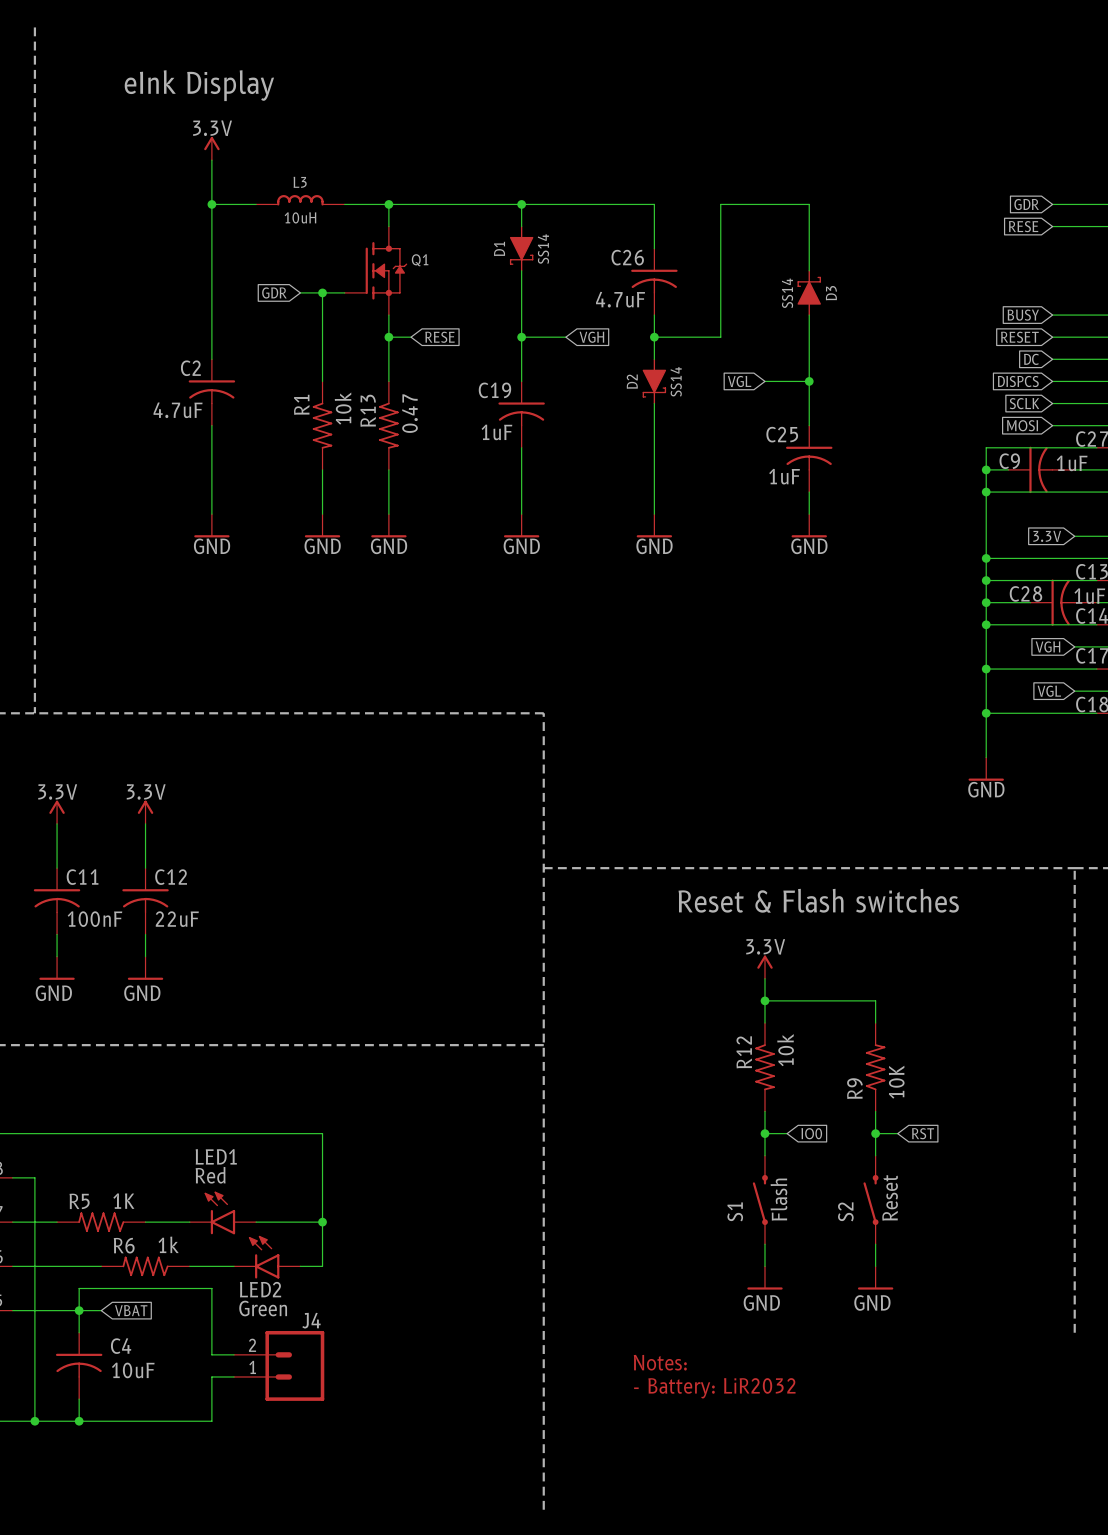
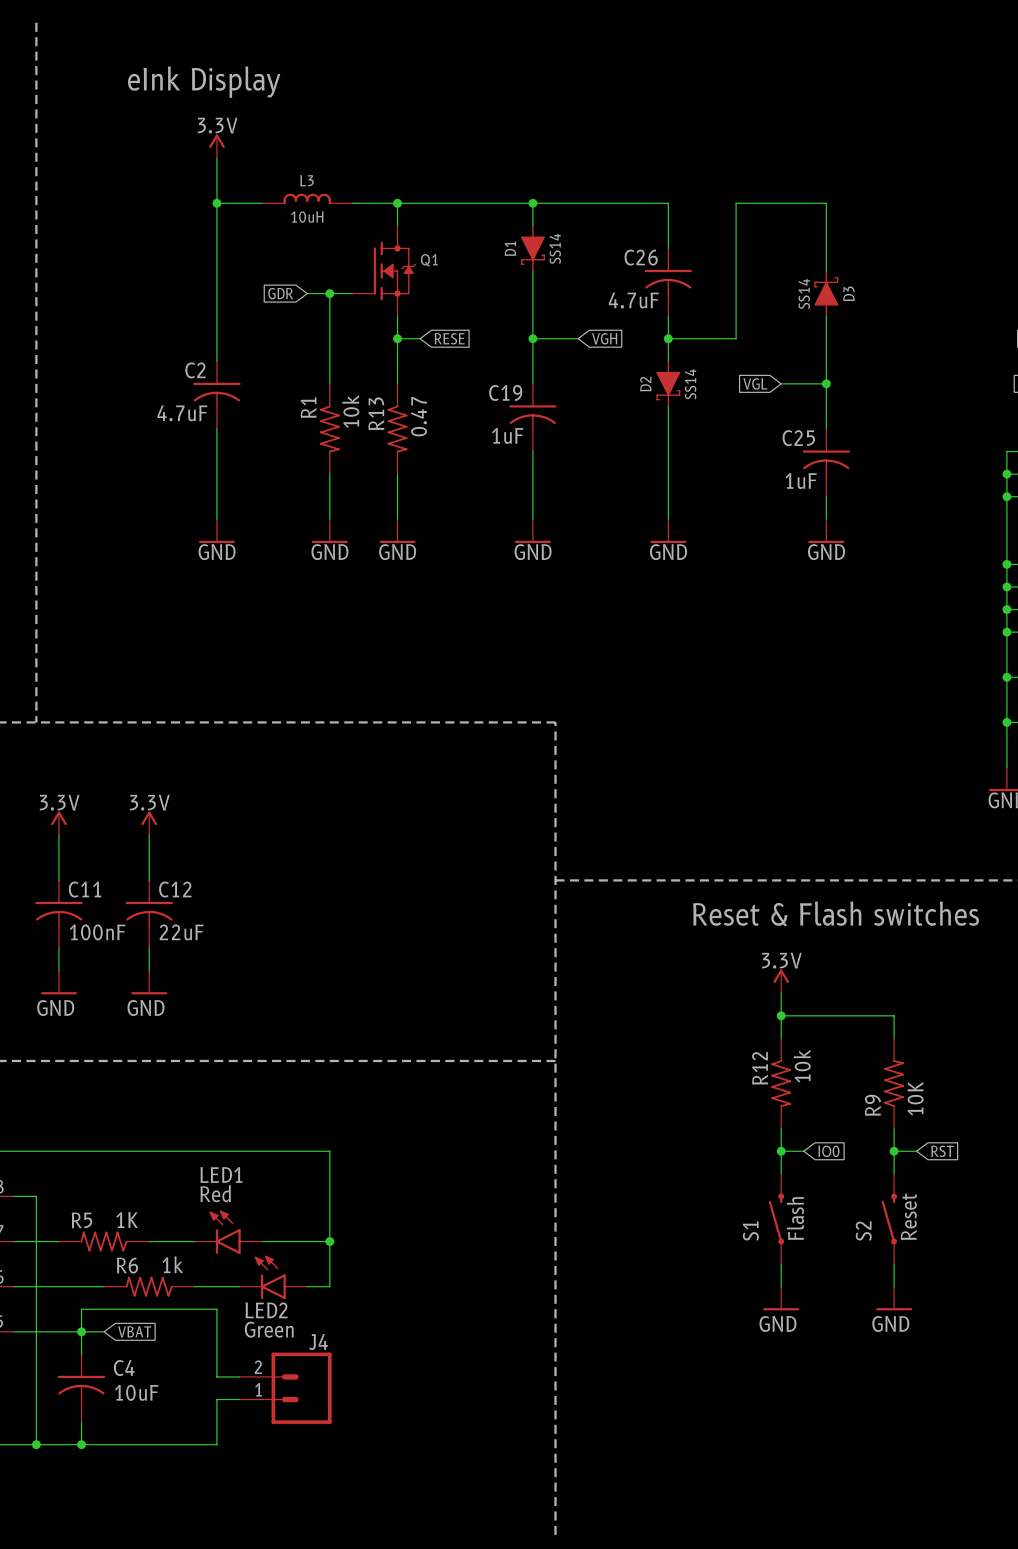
text: Notes: (660, 1362) -> none
text: - Battery: LiR2032 (714, 1388) -> none

